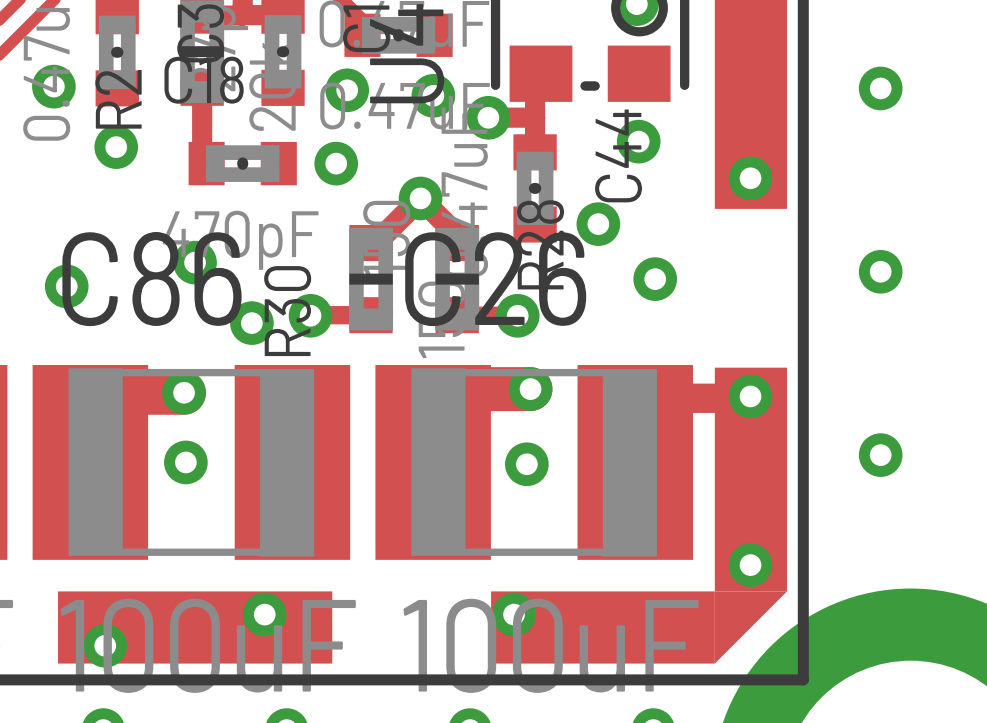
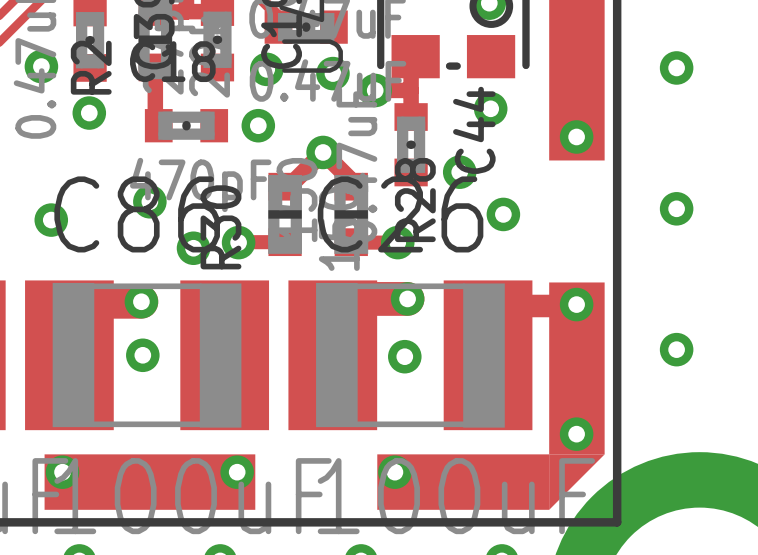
via position: (264, 614) -> (237, 472)
via position: (105, 645) -> (62, 472)

